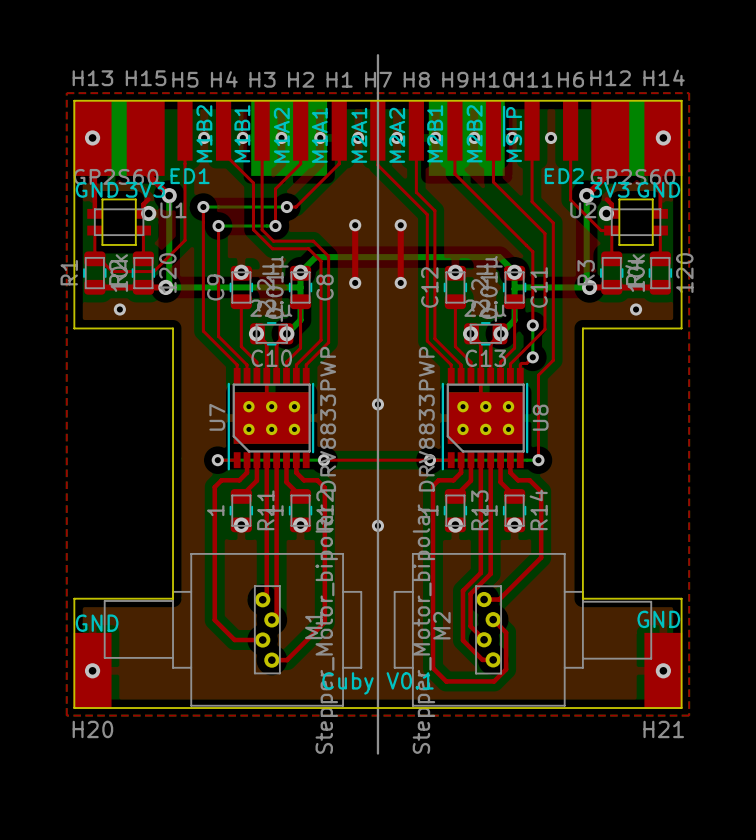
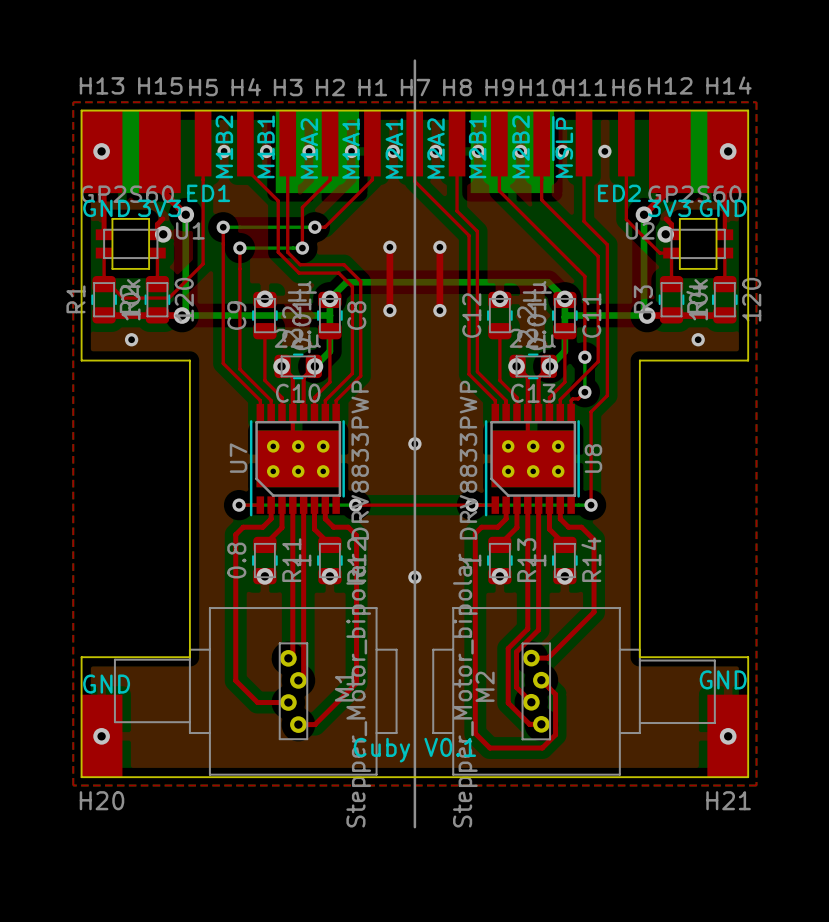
R11 value: 1 (215, 510) -> 0.8 (236, 560)

